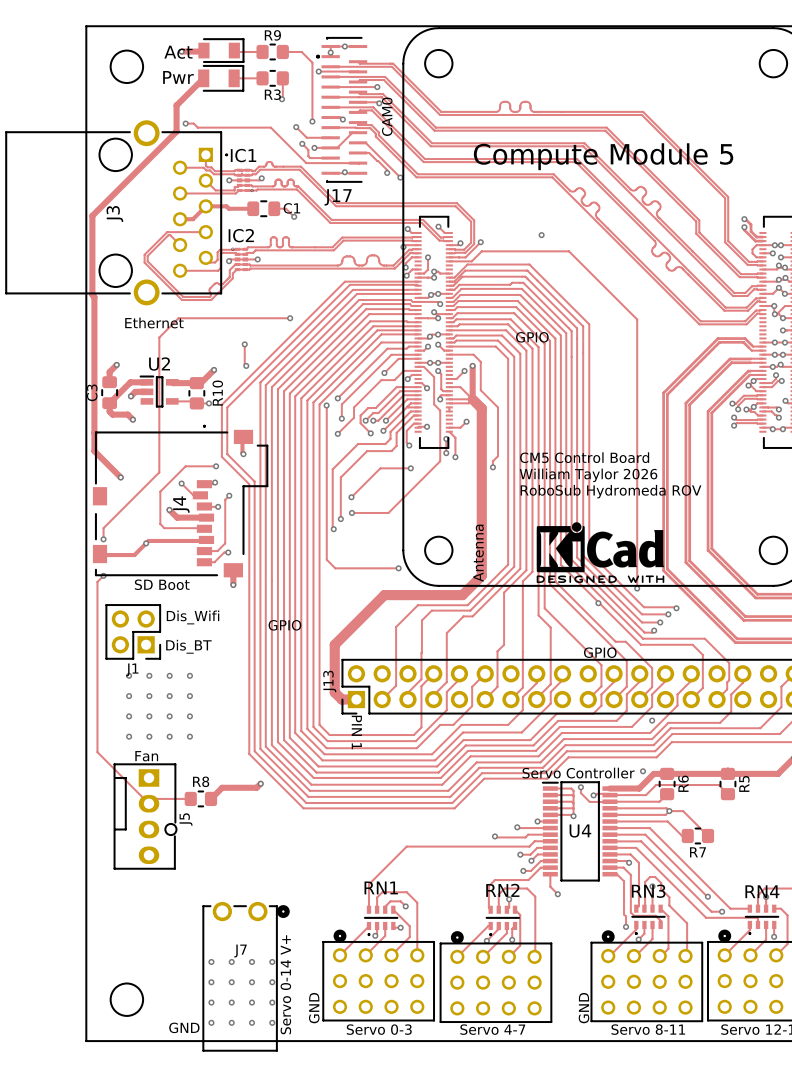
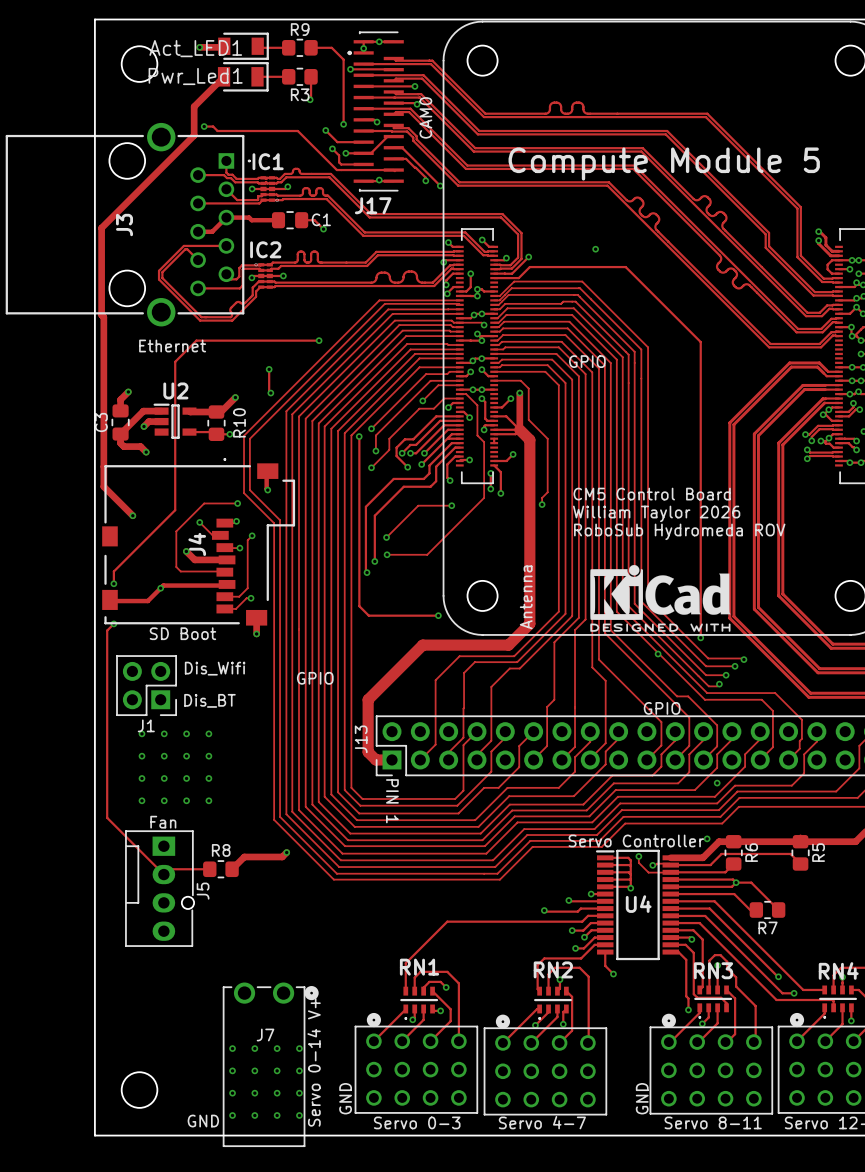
Act name: Act (178, 52) -> Act_LED1 (195, 48)
Pwr name: Pwr (178, 77) -> Pwr_Led1 (195, 76)

